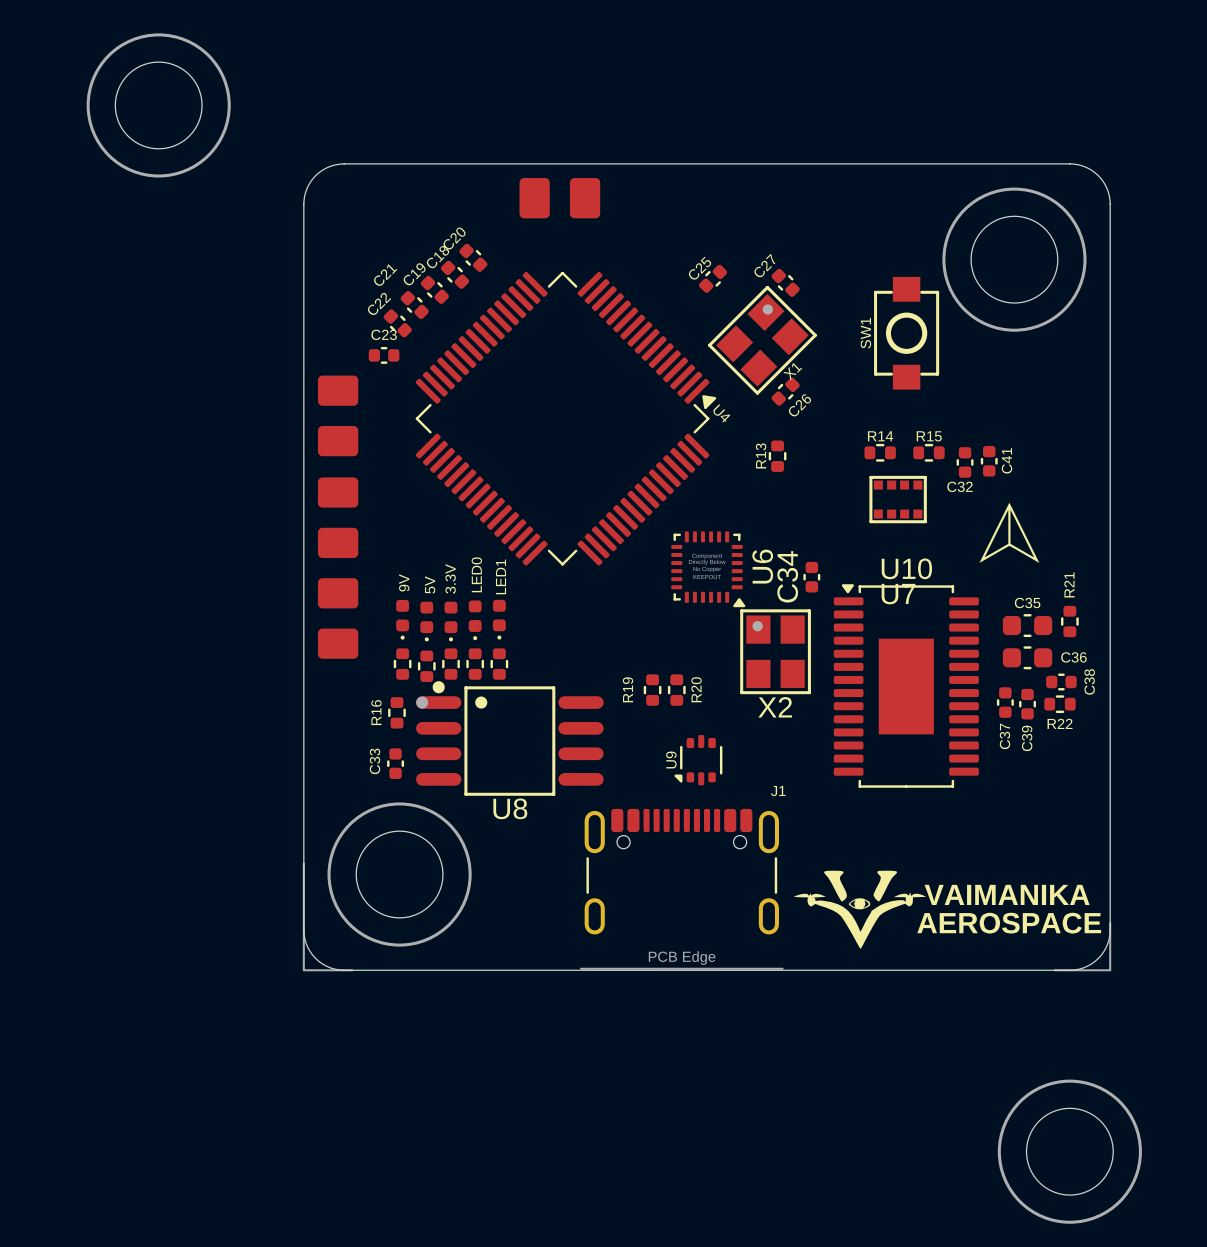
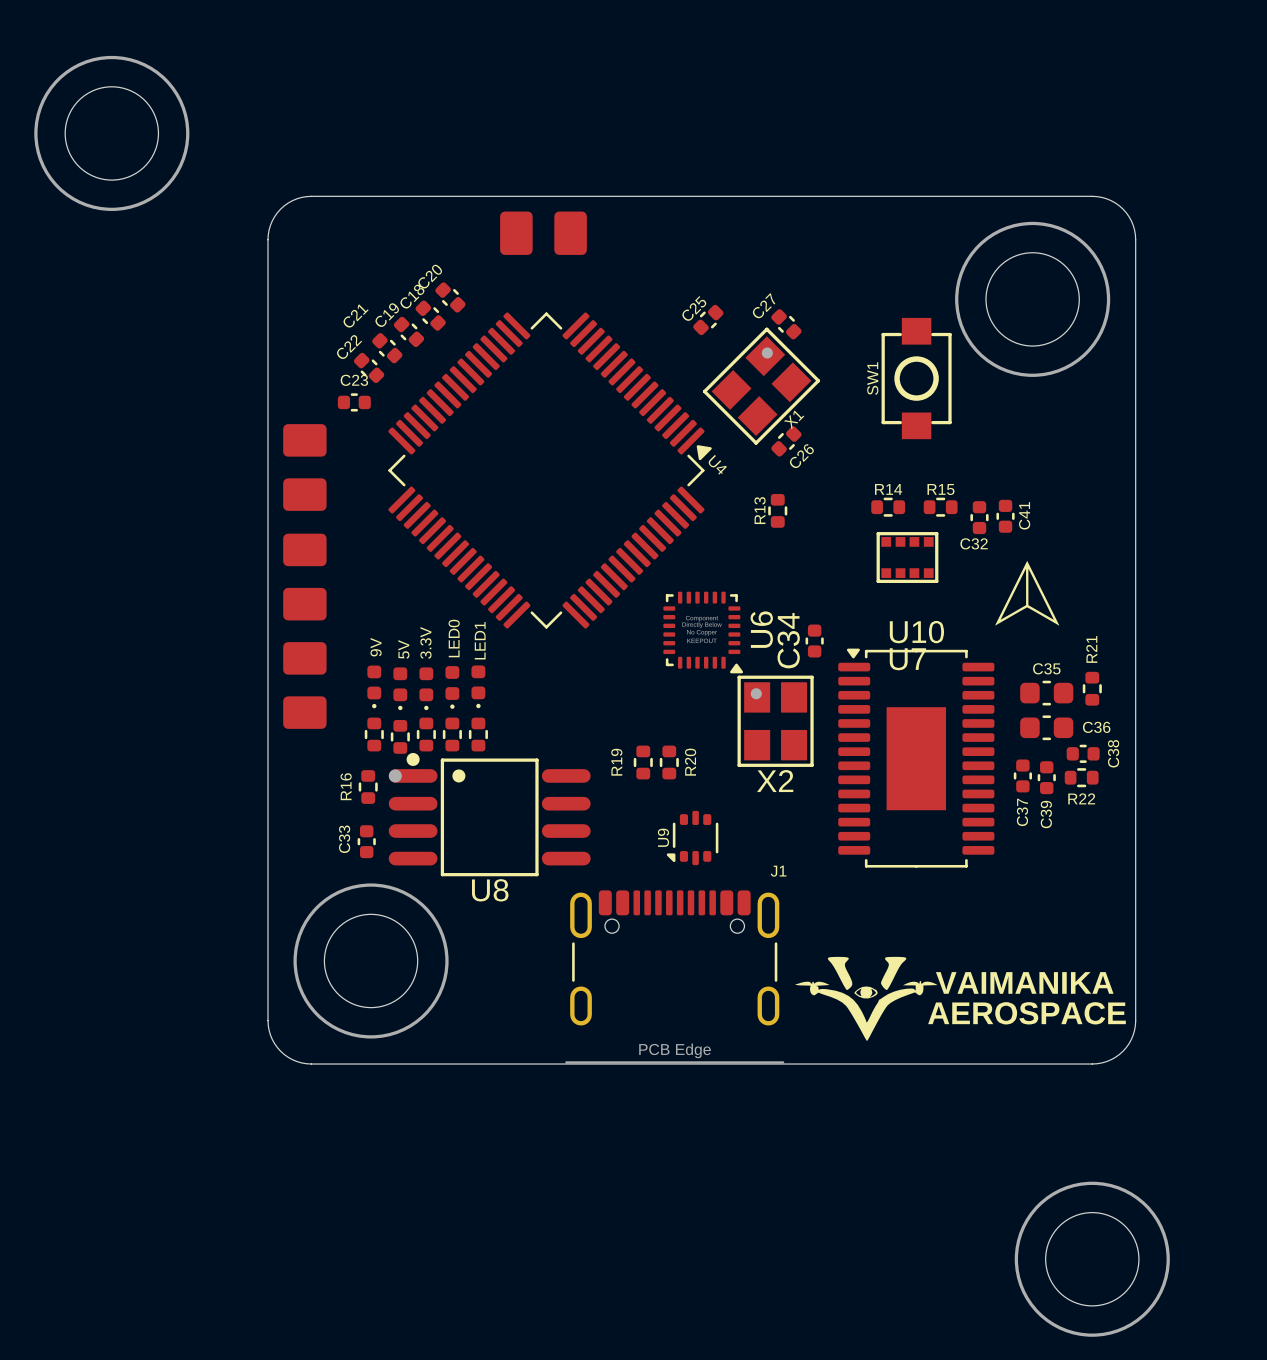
line: (303, 863) (303, 970) (352, 970) -> none
line: (1110, 922) (1110, 970) (1054, 970) -> none

